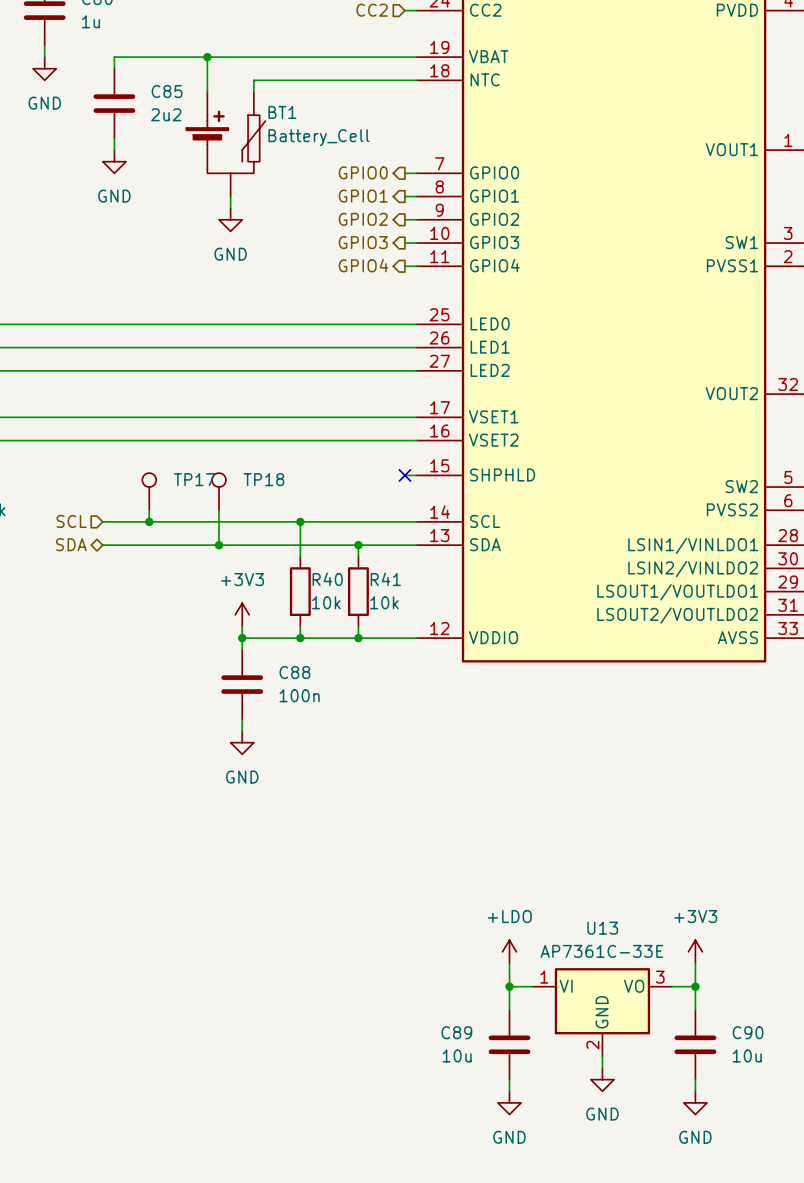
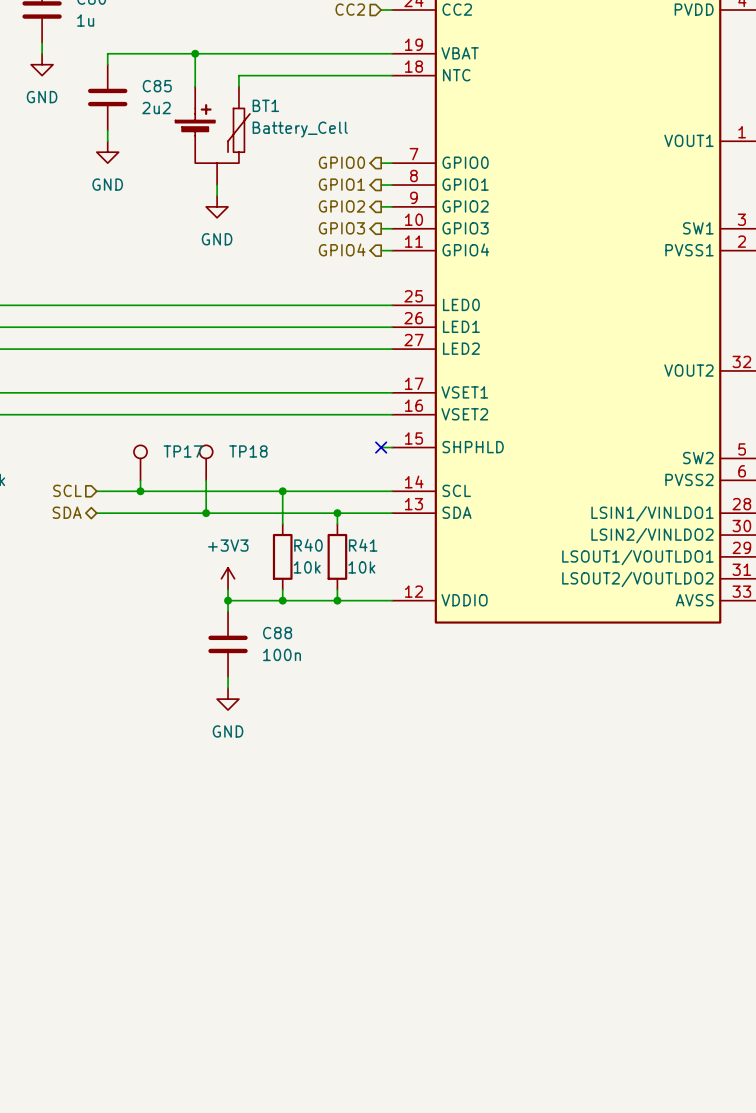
power symbol: +LDO (509, 951) -> none
power symbol: +3V3 (695, 951) -> none
wire: (509, 963) (509, 1009) -> none
wire: (695, 963) (695, 1009) -> none
wire: (509, 986) (532, 986) -> none
junction: (509, 986) -> none
wire: (672, 986) (695, 986) -> none
junction: (695, 986) -> none
U13: AP7361C-33E (602, 1012) -> none
C89: 10u (509, 1044) -> none
C90: 10u (695, 1044) -> none
wire: (602, 1056) (602, 1068) -> none
wire: (509, 1079) (509, 1091) -> none
power symbol: GND (602, 1079) -> none
wire: (695, 1079) (695, 1091) -> none
power symbol: GND (509, 1102) -> none
power symbol: GND (695, 1102) -> none

